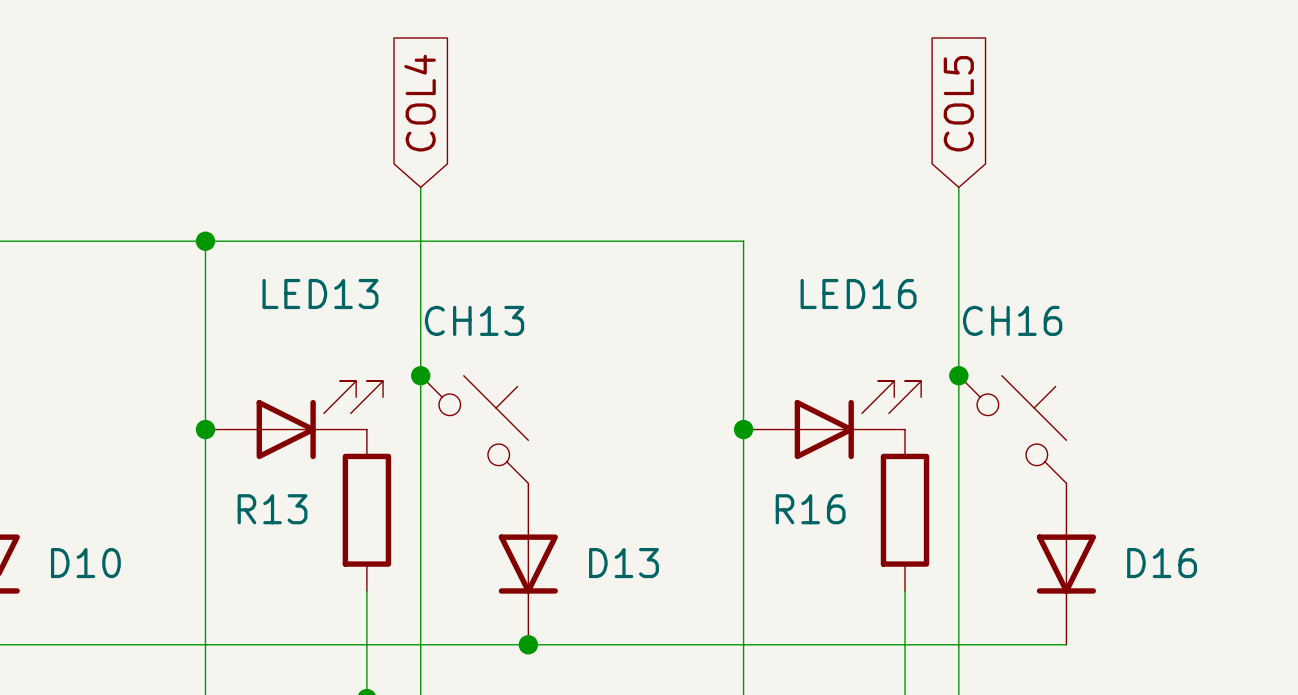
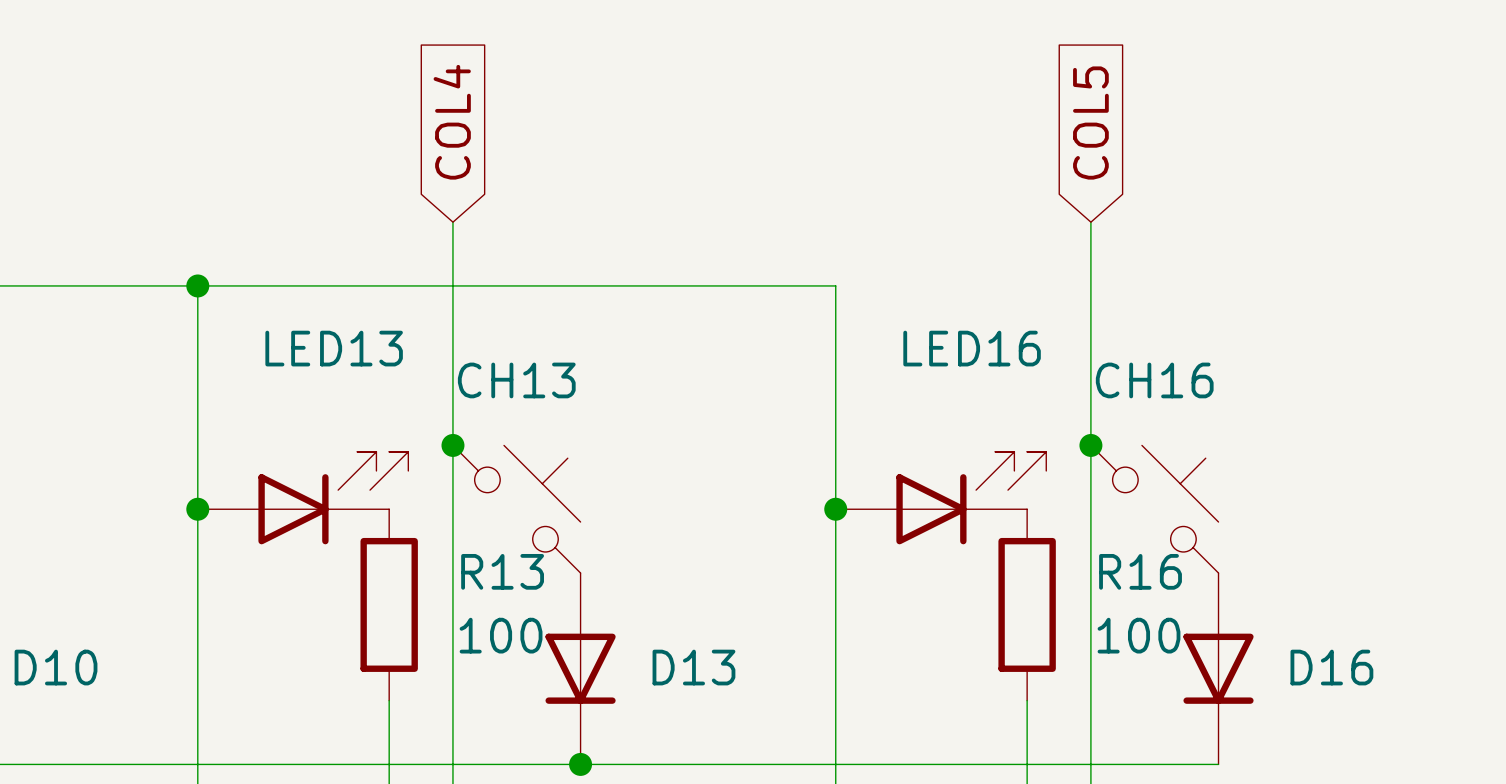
R13 name position: R13 (272, 509) -> R13 (502, 571)
R16 name position: R16 (810, 509) -> R16 (1140, 571)
R13 value: none -> 100 (501, 635)
R16 value: none -> 100 (1139, 635)

